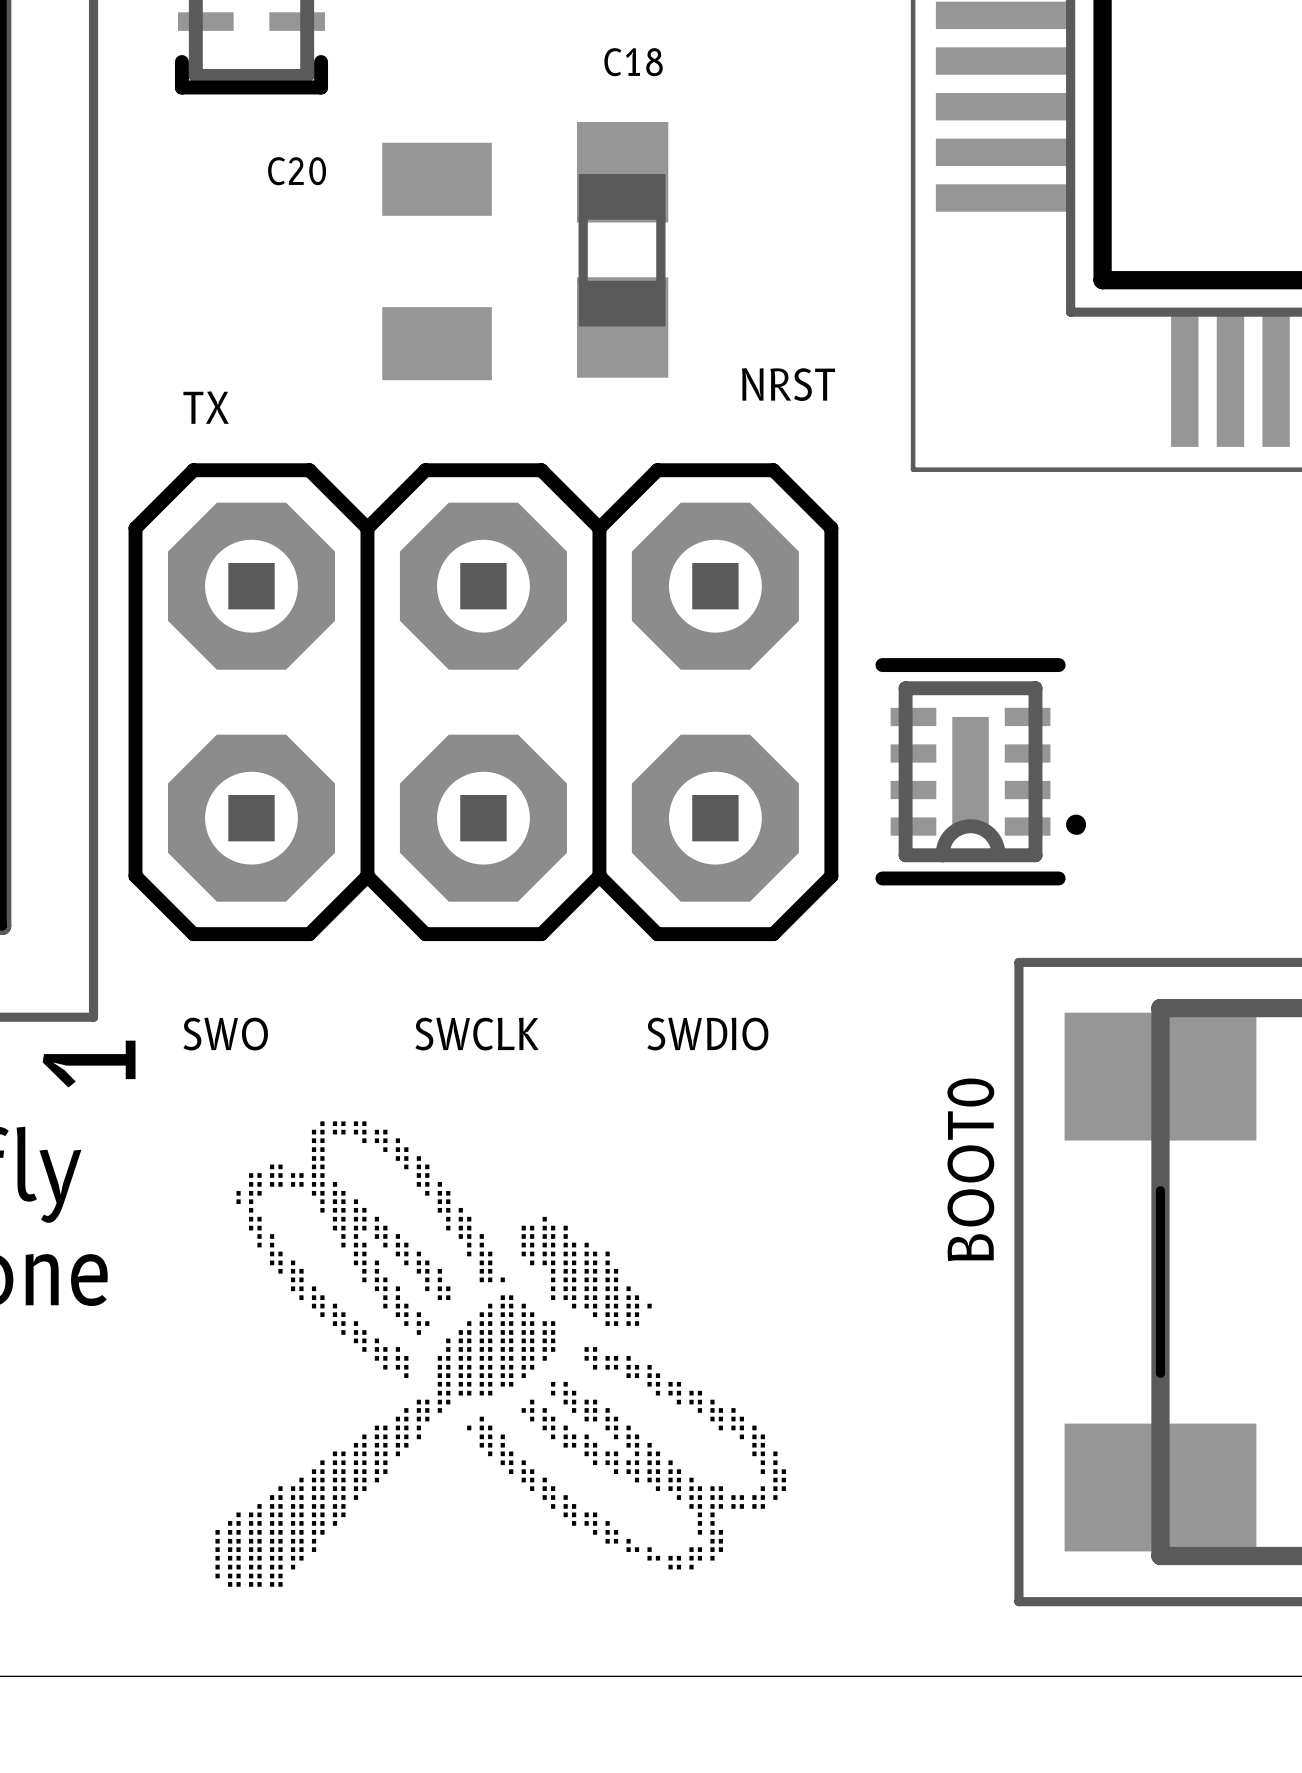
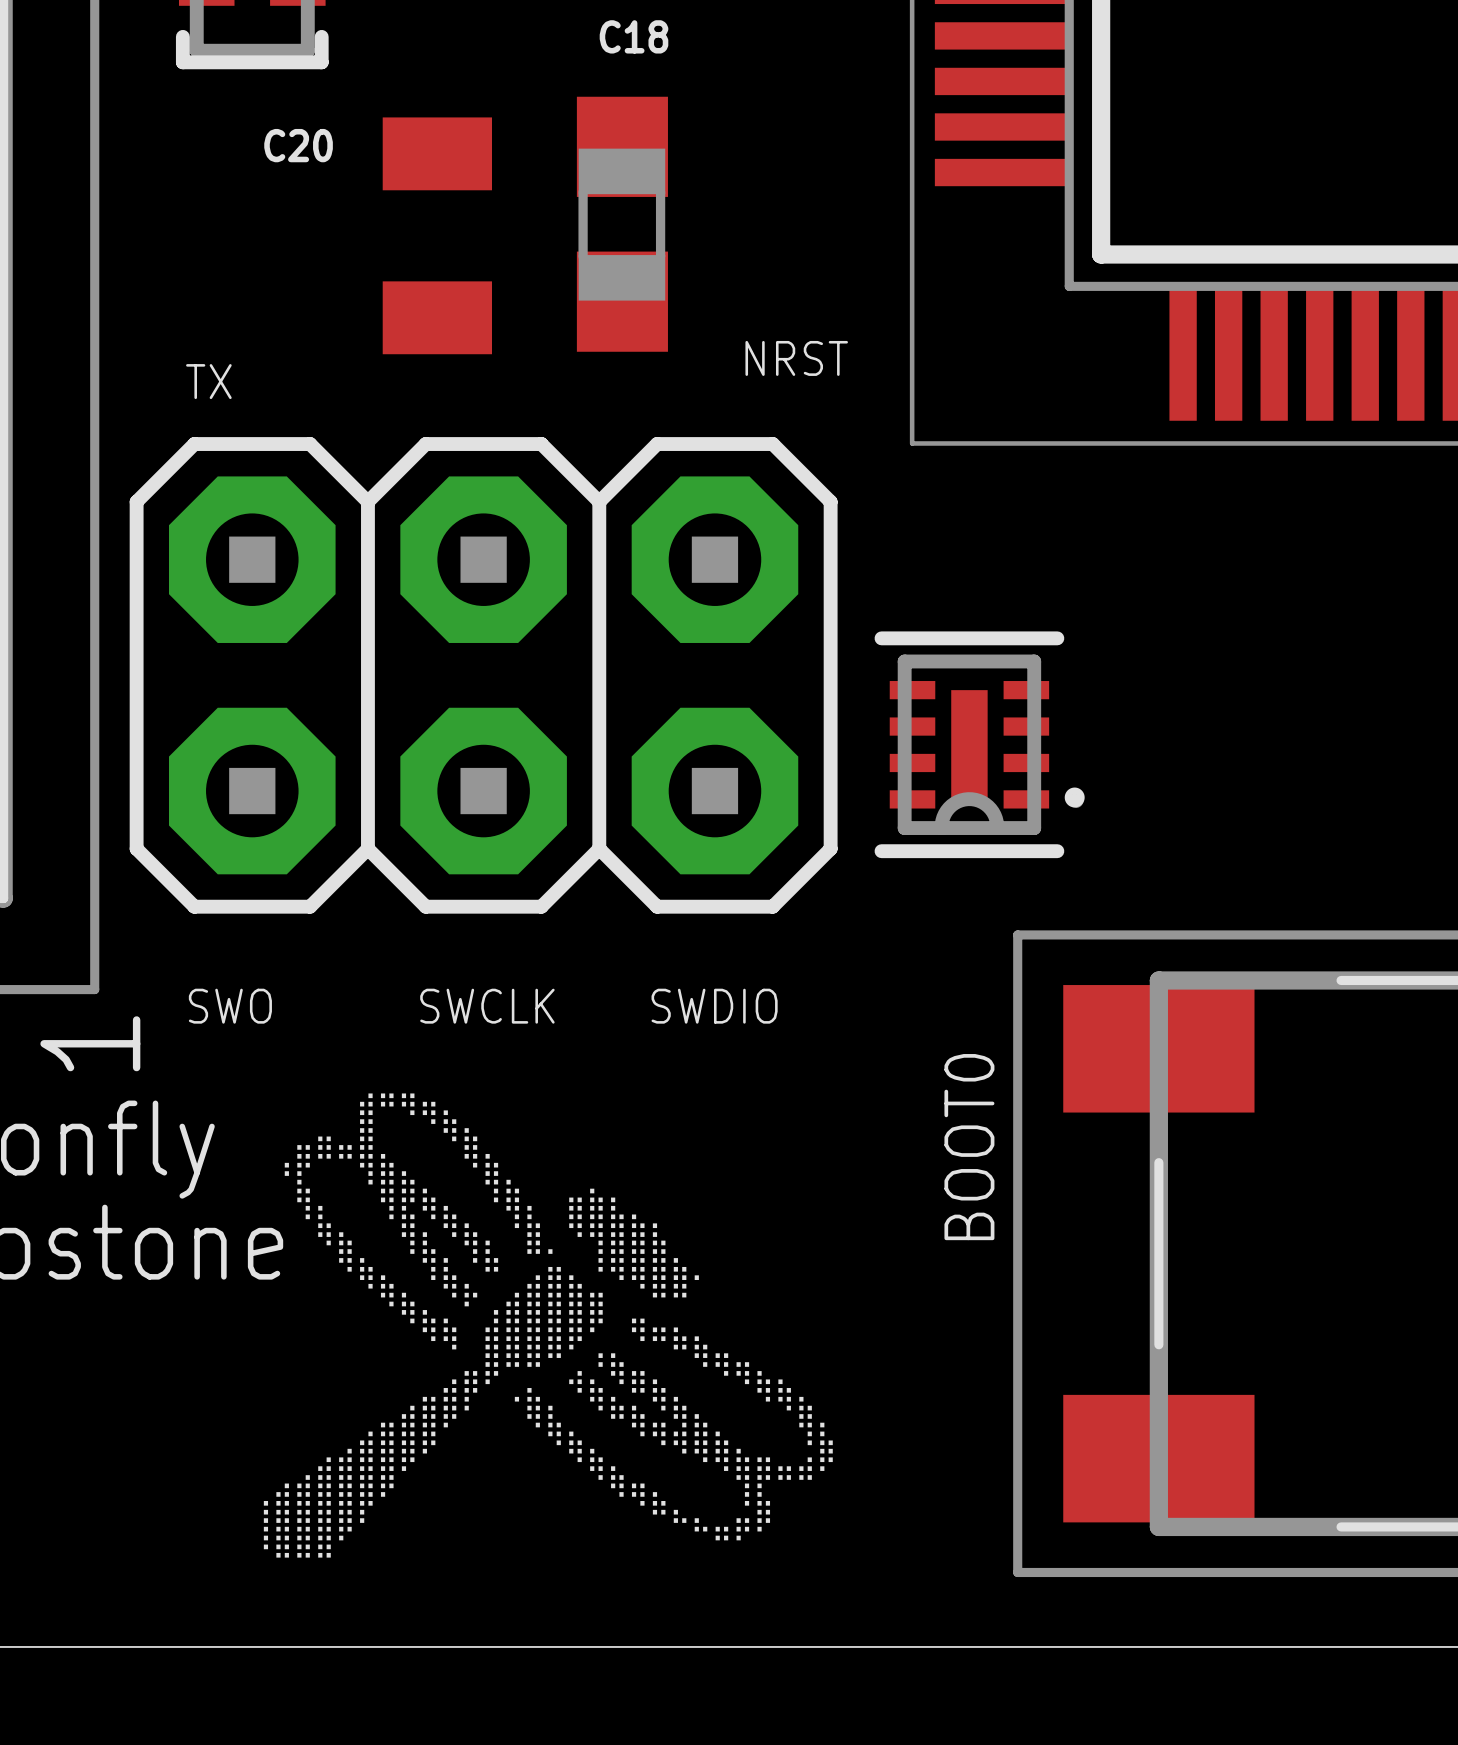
text position: ⠀⠀⠀⠀⠀⠀⢀⣀⣀⠀⠀⠀⠀⠀⠀⠀⠀⠀⠀⠀⠀⠀⠀⠀⠀⠀⠀⠀⠀⠀ (343, 1123) -> ⠀⠀⠀⠀⠀⠀⢀⣀⣀⠀⠀⠀⠀⠀⠀⠀⠀⠀⠀⠀⠀⠀⠀⠀⠀⠀⠀⠀⠀⠀ (391, 1095)
text position: ⠀⠀⠀⠀⠀⠀⣿⠉⠙⠻⣦⡀⠀⠀⠀⠀⠀⠀⠀⠀⠀⠀⠀⠀⠀⠀⠀⠀⠀⠀ (366, 1145) -> ⠀⠀⠀⠀⠀⠀⣿⠉⠙⠻⣦⡀⠀⠀⠀⠀⠀⠀⠀⠀⠀⠀⠀⠀⠀⠀⠀⠀⠀⠀ (414, 1117)
text position: ⠀⠀⢀⣶⠿⠶⣿⣄⠀⠀⠈⢿⣄⠀⠀⠀⠀⠀⠀⠀⠀⠀⠀⠀⠀⠀⠀⠀⠀⠀ (343, 1180) -> ⠀⠀⢀⣶⠿⠶⣿⣄⠀⠀⠈⢿⣄⠀⠀⠀⠀⠀⠀⠀⠀⠀⠀⠀⠀⠀⠀⠀⠀⠀ (391, 1152)
text position: ⠀⠀⠈⣧⠀⠀⠘⣿⣷⣄⠀⠀⢻⣦⠀⠀⣀⣄⡀⠀⠀⠀⠀⠀⠀⠀⠀⠀⠀⠀ (402, 1214) -> ⠀⠀⠈⣧⠀⠀⠘⣿⣷⣄⠀⠀⢻⣦⠀⠀⣀⣄⡀⠀⠀⠀⠀⠀⠀⠀⠀⠀⠀⠀ (450, 1186)
text position: ⠀⠀⠀⠘⣧⡀⠀⠘⣷⡙⢷⣄⠀⠹⣧⠀⢿⣿⣷⣦⡄⠀⠀⠀⠀⠀⠀⠀⠀⠀ (433, 1249) -> ⠀⠀⠀⠘⣧⡀⠀⠘⣷⡙⢷⣄⠀⠹⣧⠀⢿⣿⣷⣦⡄⠀⠀⠀⠀⠀⠀⠀⠀⠀ (481, 1221)
text position: ⠀⠀⠀⠀⠈⢿⣄⠀⠘⢷⡄⠹⣧⠀⠛⣂⠀⢸⣿⣿⣿⣄⠀⠀⠀⠀⠀⠀⠀⠀ (458, 1284) -> ⠀⠀⠀⠀⠈⢿⣄⠀⠘⢷⡄⠹⣧⠀⠛⣂⠀⢸⣿⣿⣿⣄⠀⠀⠀⠀⠀⠀⠀⠀ (506, 1256)
text position: ⠀⠀⠀⠀⠀⠀⠙⢷⣄⠈⠻⡦⠀⣠⣾⣿⣷⣤⠈⠙⠿⠿⠁⠀⠀⠀⠀⠀⠀⠀ (481, 1319) -> ⠀⠀⠀⠀⠀⠀⠙⢷⣄⠈⠻⡦⠀⣠⣾⣿⣷⣤⠈⠙⠿⠿⠁⠀⠀⠀⠀⠀⠀⠀ (529, 1290)
text position: ⠀⠀⠀⠀⠀⠀⠀⠀⠙⢷⣦⠀⣼⣿⣿⣿⣿⠟⠀⢶⣤⣄⡀⠀⠀⠀⠀⠀⠀⠀ (502, 1354) -> ⠀⠀⠀⠀⠀⠀⠀⠀⠙⢷⣦⠀⣼⣿⣿⣿⣿⠟⠀⢶⣤⣄⡀⠀⠀⠀⠀⠀⠀⠀ (550, 1325)
text position: ⠀⠀⠀⠀⠀⠀⠀⠀⠀⠀⠈⣀⣿⠿⠿⠛⢁⠰⣦⣀⠀⠉⠻⢶⣤⡀⠀⠀⠀⠀ (559, 1388) -> ⠀⠀⠀⠀⠀⠀⠀⠀⠀⠀⠈⣀⣿⠿⠿⠛⢁⠰⣦⣀⠀⠉⠻⢶⣤⡀⠀⠀⠀⠀ (606, 1360)
text position: ⠀⠀⠀⠀⠀⠀⠀⠀⢀⣤⣾⡟⠁⠠⣦⡀⠙⢷⣌⡛⢷⣄⠀⠀⠈⠻⢷⣄⠀⠀ (563, 1423) -> ⠀⠀⠀⠀⠀⠀⠀⠀⢀⣤⣾⡟⠁⠠⣦⡀⠙⢷⣌⡛⢷⣄⠀⠀⠈⠻⢷⣄⠀⠀ (611, 1394)
text position: ⠀⠀⠀⠀⠀⠀⣠⣶⣿⣿⠋⠀⠀⠀⠙⢷⣄⠀⠉⠻⢶⣽⣷⣄⠀⠀⠀⢻⣆⠀ (548, 1458) -> ⠀⠀⠀⠀⠀⠀⣠⣶⣿⣿⠋⠀⠀⠀⠙⢷⣄⠀⠉⠻⢶⣽⣷⣄⠀⠀⠀⢻⣆⠀ (596, 1429)
text position: ⠀⠀⠀⢀⣴⣾⣿⣿⠟⠁⠀⠀⠀⠀⠀⠀⠙⢷⣄⠀⠀⠈⠙⠻⣷⣶⣤⣴⠟⠀ (521, 1493) -> ⠀⠀⠀⢀⣴⣾⣿⣿⠟⠁⠀⠀⠀⠀⠀⠀⠙⢷⣄⠀⠀⠈⠙⠻⣷⣶⣤⣴⠟⠀ (569, 1464)
text position: ⠀⢠⣾⣿⣿⣿⡿⠋⠀⠀⠀⠀⠀⠀⠀⠀⠀⠀⠙⠻⣦⡀⠀⠀⠸⣧⠀⠀⠀⠀ (469, 1528) -> ⠀⢠⣾⣿⣿⣿⡿⠋⠀⠀⠀⠀⠀⠀⠀⠀⠀⠀⠙⠻⣦⡀⠀⠀⠸⣧⠀⠀⠀⠀ (516, 1499)
text position: ⠀⢸⣿⣿⣿⠟⠁⠀⠀⠀⠀⠀⠀⠀⠀⠀⠀⠀⠀⠀⠀⠉⠓⠶⠟⠋⠀⠀⠀⠀ (469, 1562) -> ⠀⢸⣿⣿⣿⠟⠁⠀⠀⠀⠀⠀⠀⠀⠀⠀⠀⠀⠀⠀⠀⠉⠓⠶⠟⠋⠀⠀⠀⠀ (516, 1533)
text position: ⠀⠀⠉⠉⠉⠀⠀⠀⠀⠀⠀⠀⠀⠀⠀⠀⠀⠀⠀⠀⠀⠀⠀⠀⠀⠀⠀⠀⠀⠀ (255, 1584) -> ⠀⠀⠉⠉⠉⠀⠀⠀⠀⠀⠀⠀⠀⠀⠀⠀⠀⠀⠀⠀⠀⠀⠀⠀⠀⠀⠀⠀⠀⠀ (303, 1555)

